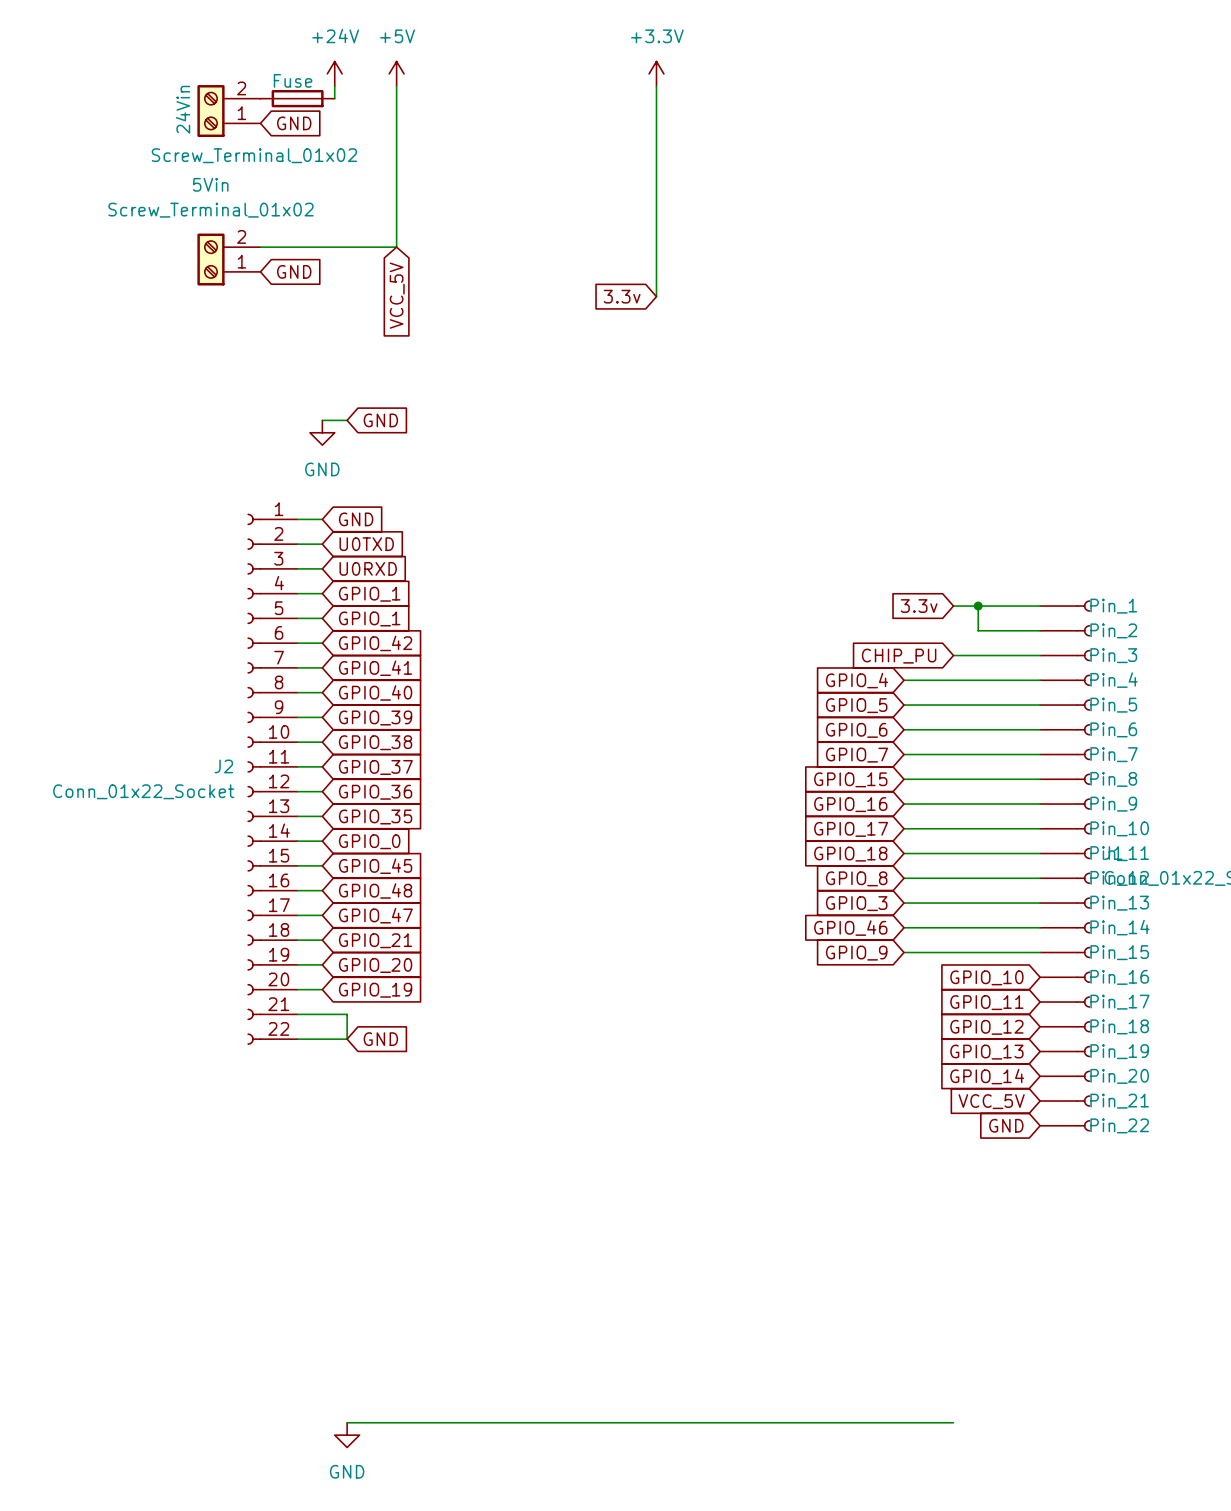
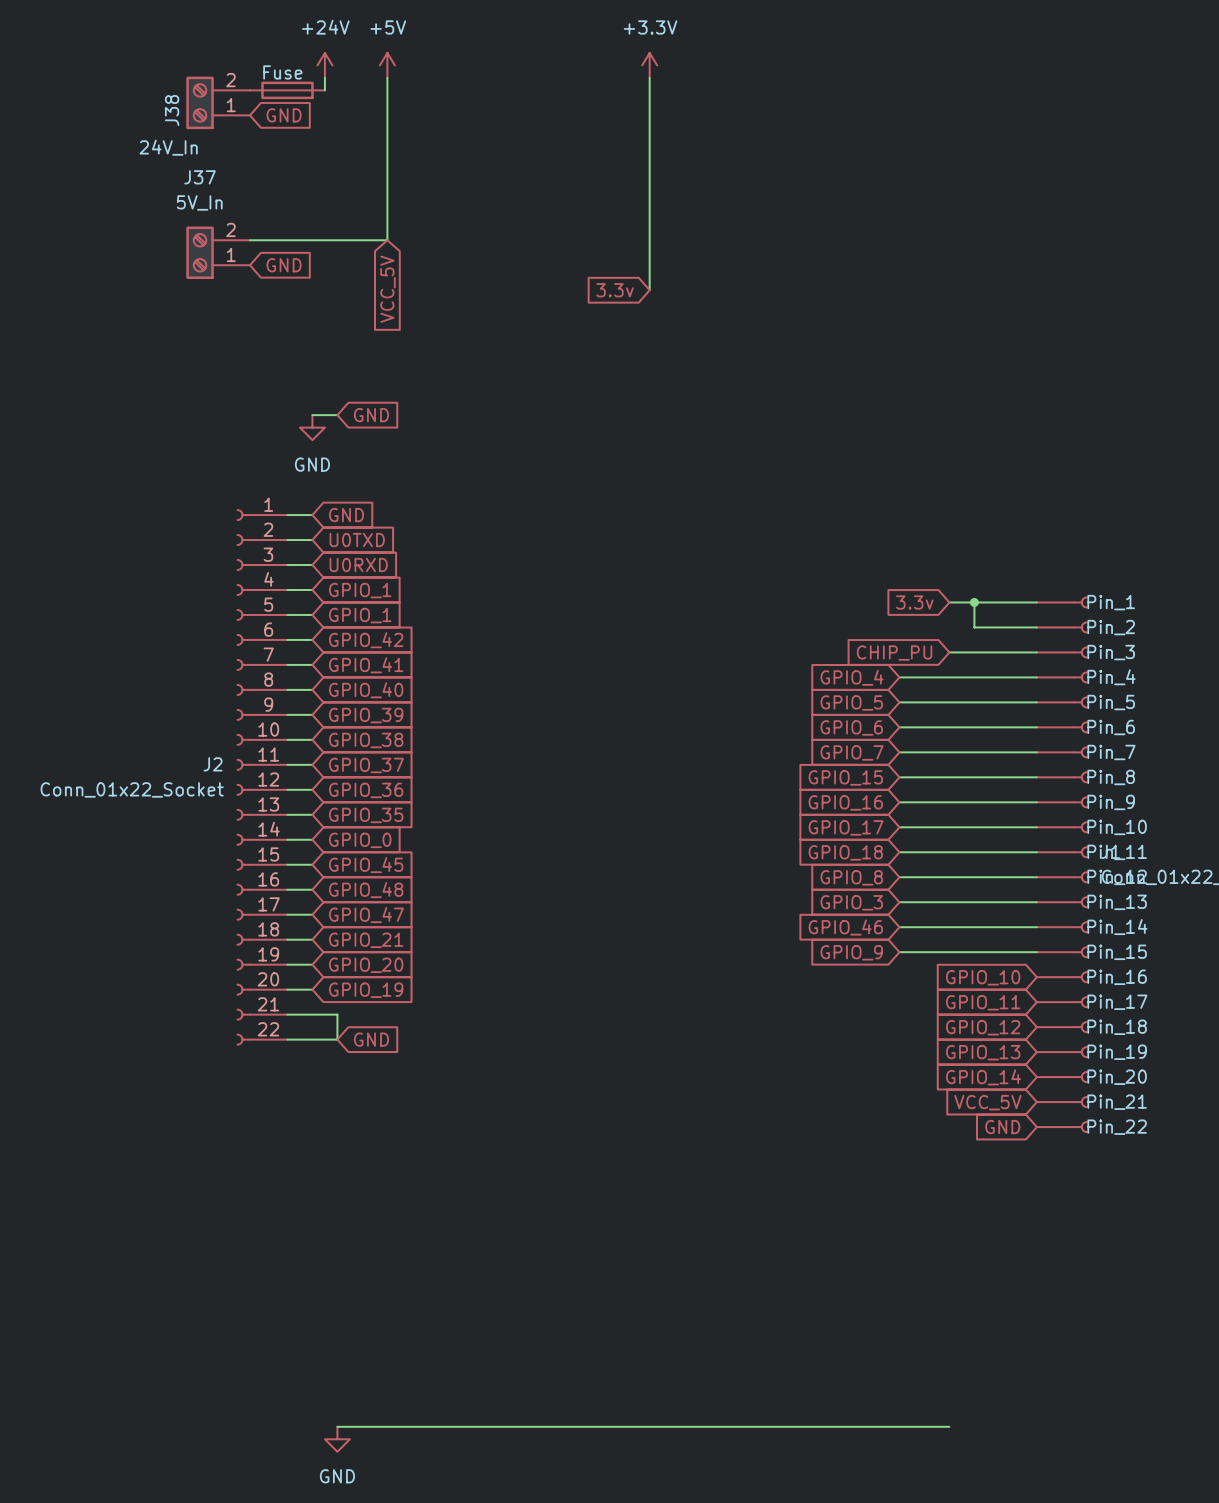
24Vin name: 24Vin (183, 109) -> J38 (172, 110)
24Vin value: Screw_Terminal_01x02 (254, 155) -> 24V_In (168, 147)
5Vin name: 5Vin (210, 184) -> J37 (200, 177)
5Vin value: Screw_Terminal_01x02 (210, 210) -> 5V_In (199, 202)

